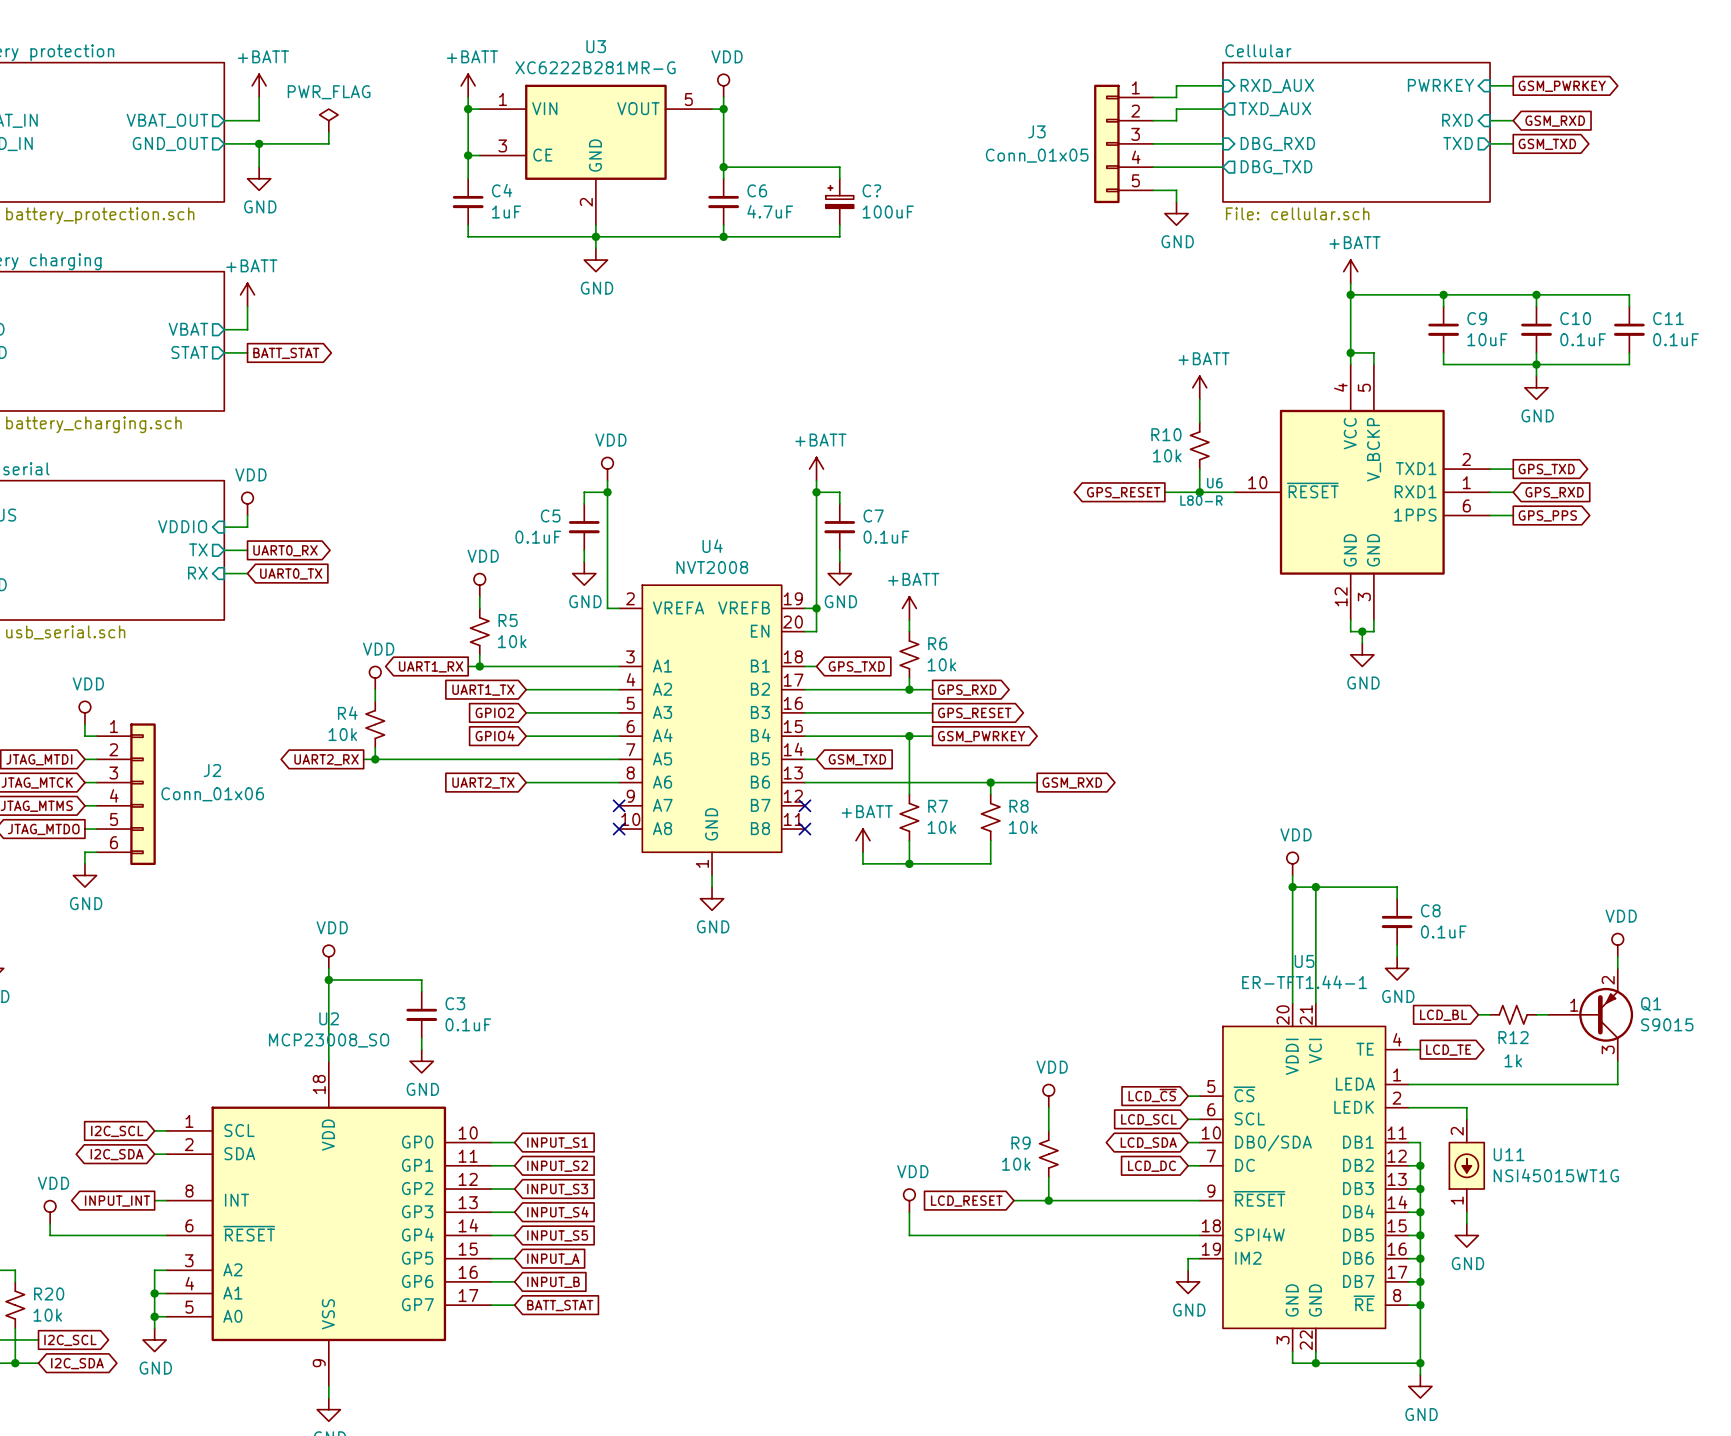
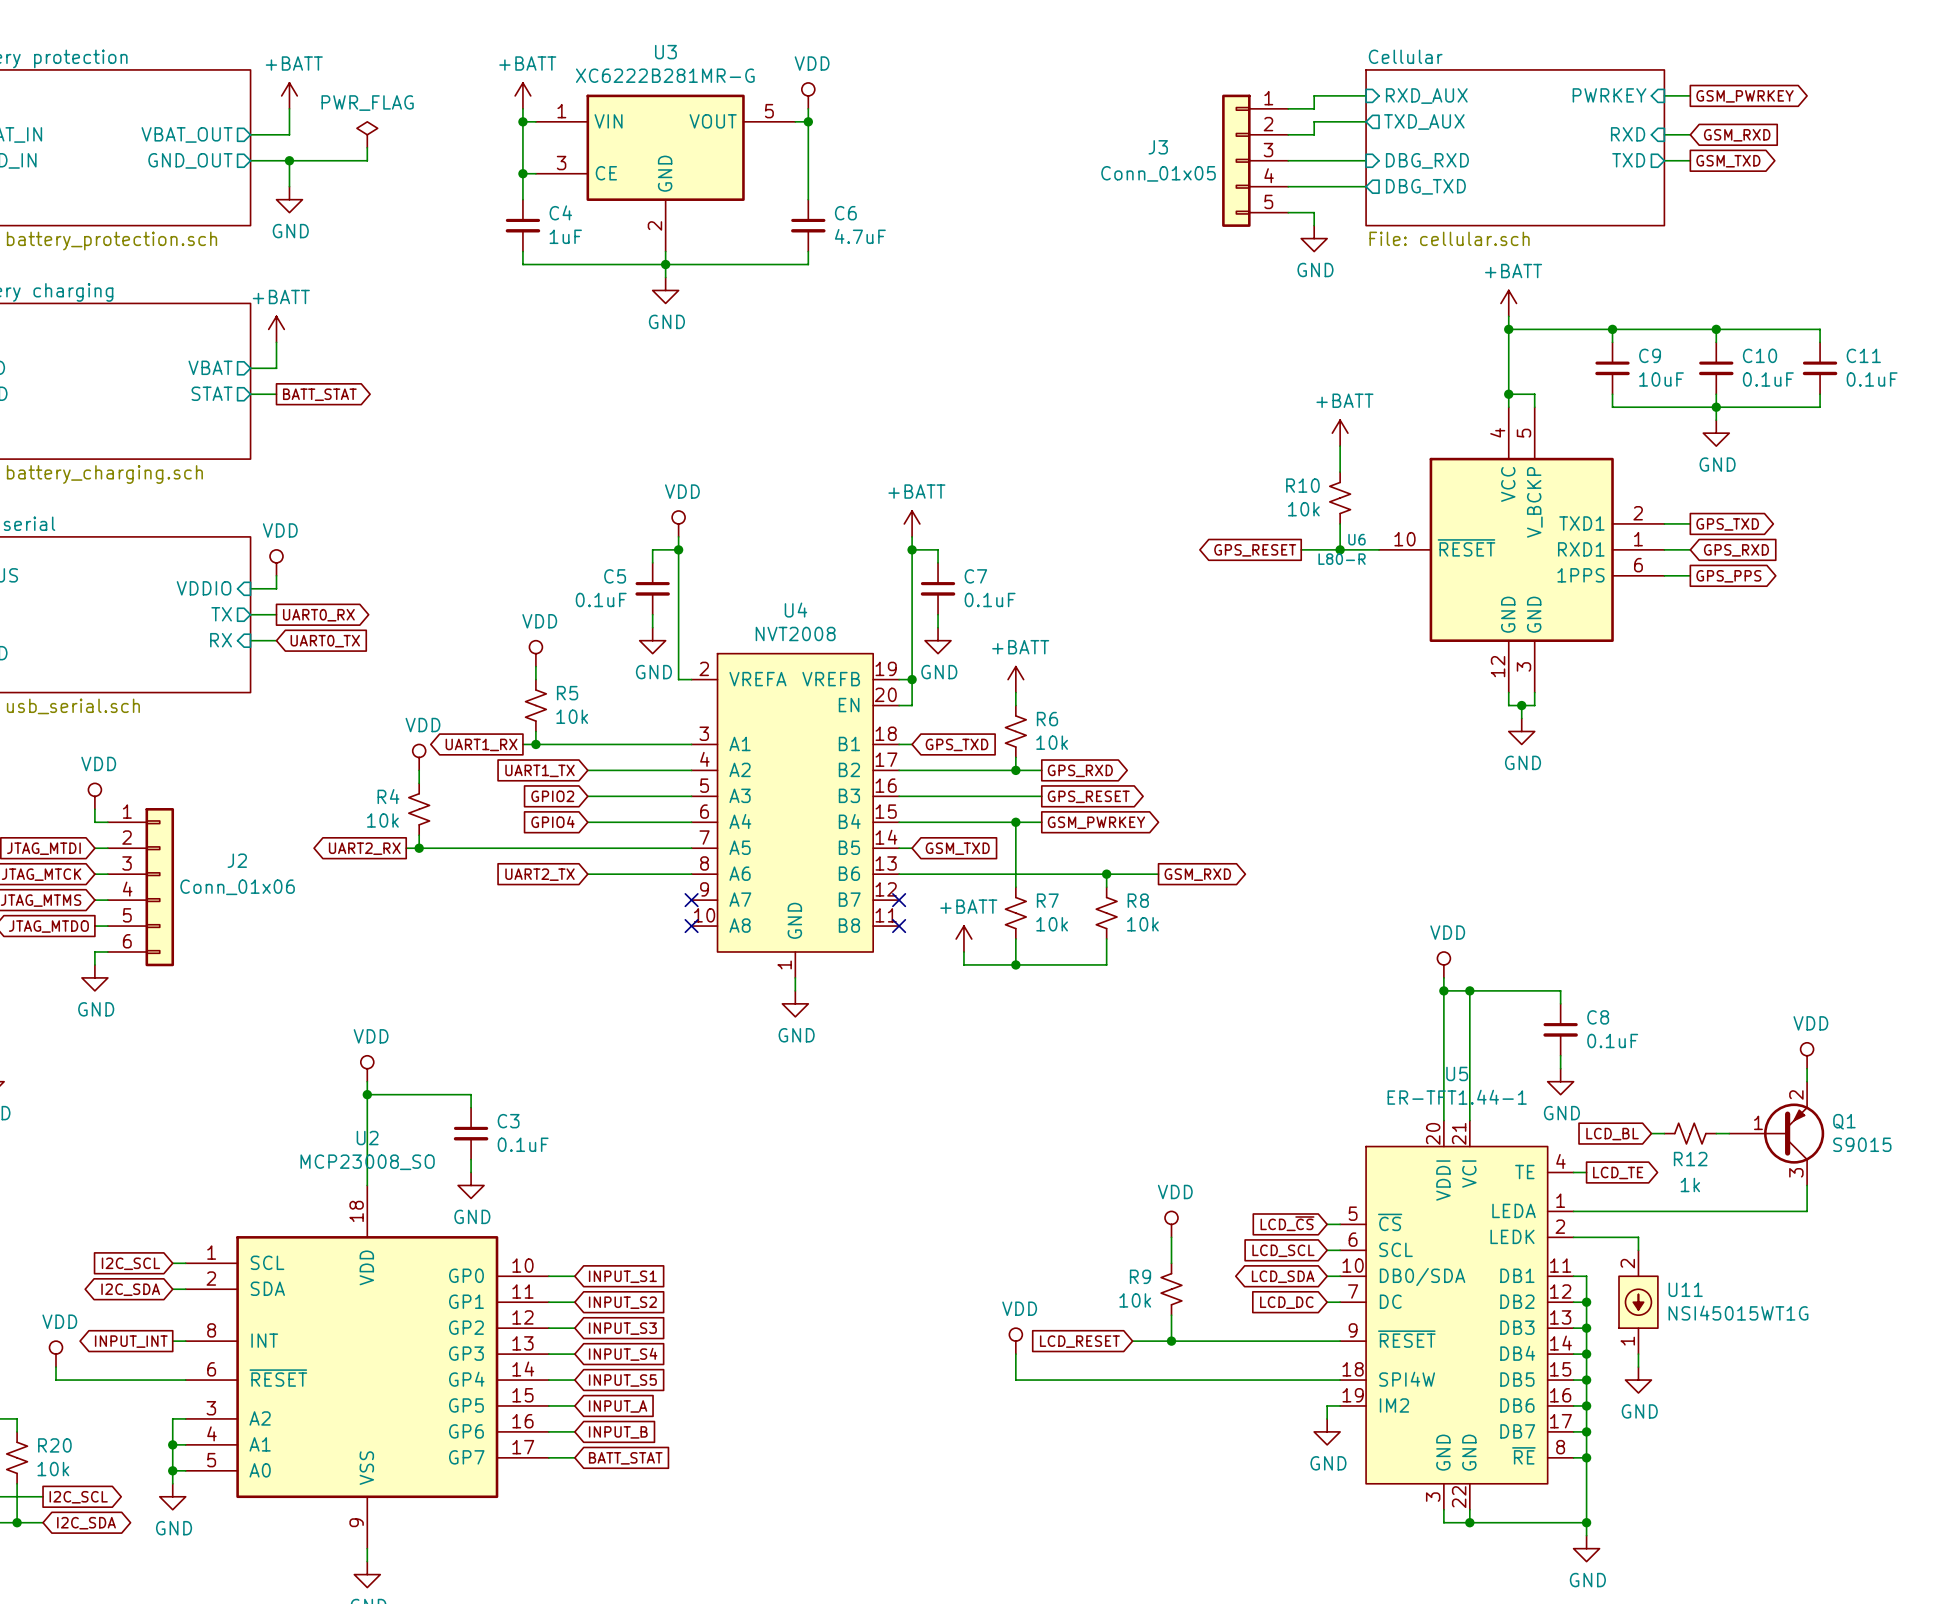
wire: (723, 167) (839, 167) (839, 178) -> none
junction: (723, 167) -> none
C?: 100uF (839, 201) -> none
wire: (839, 225) (839, 236) (723, 236) -> none
junction: (723, 236) -> none

